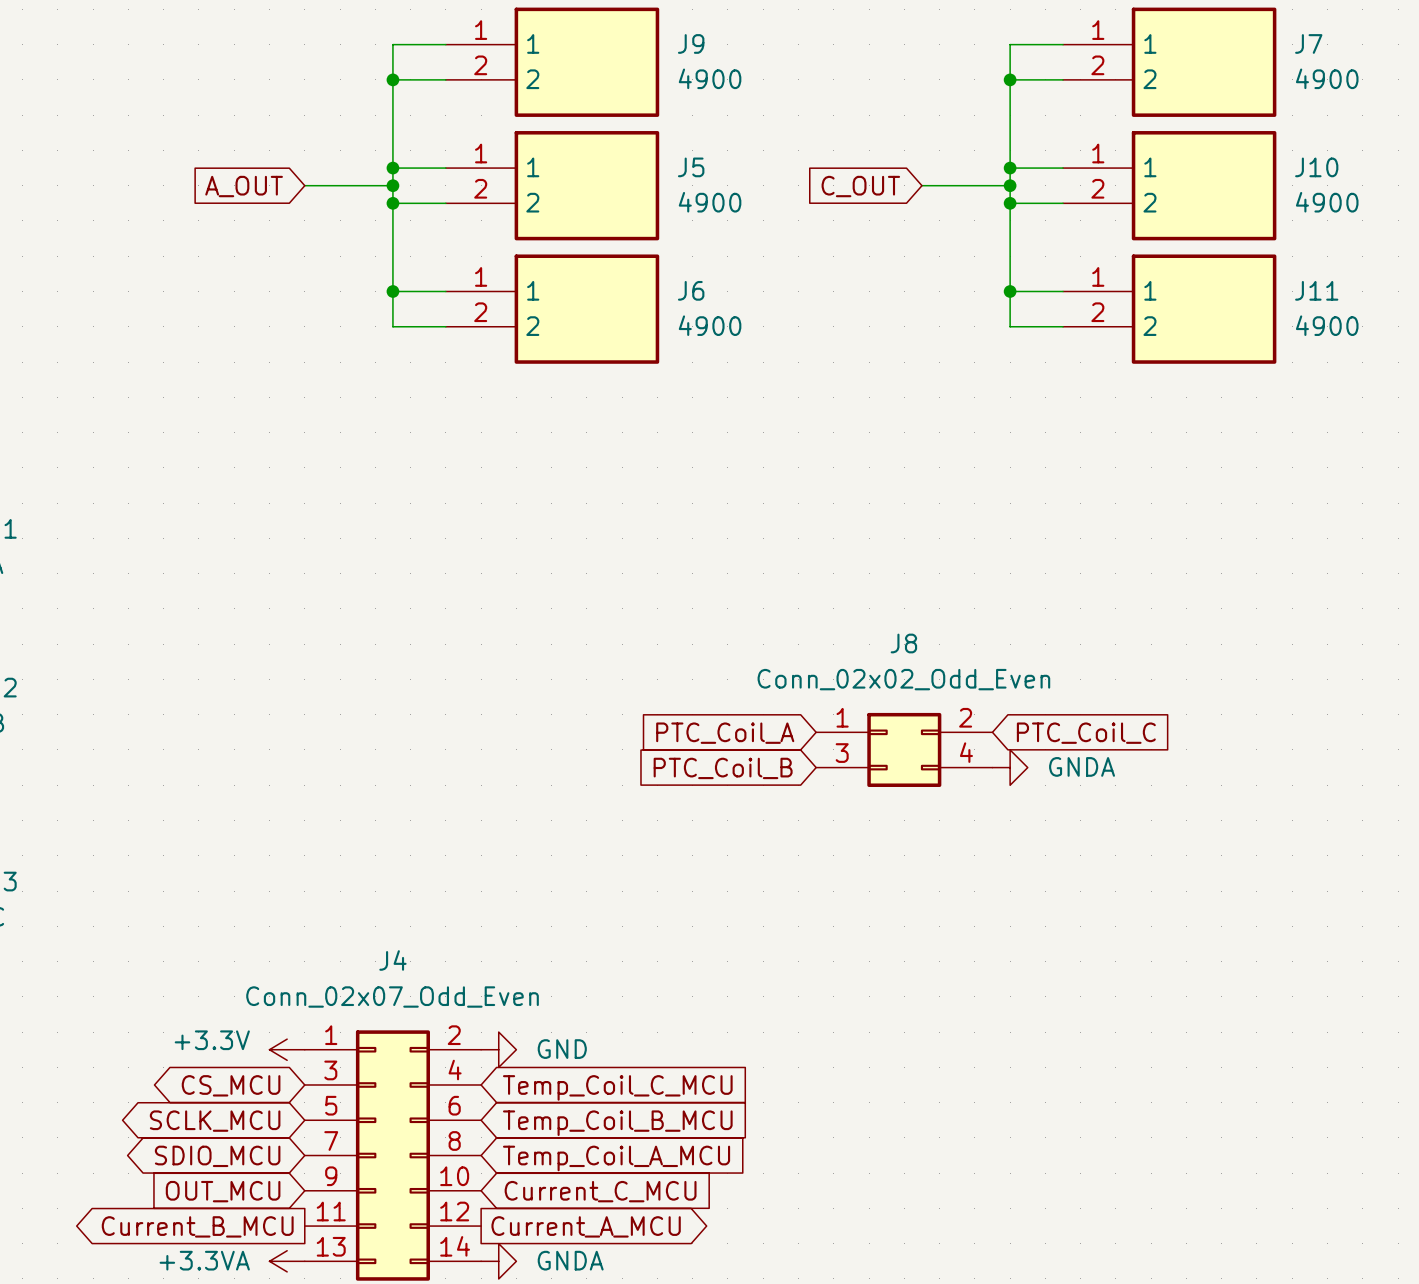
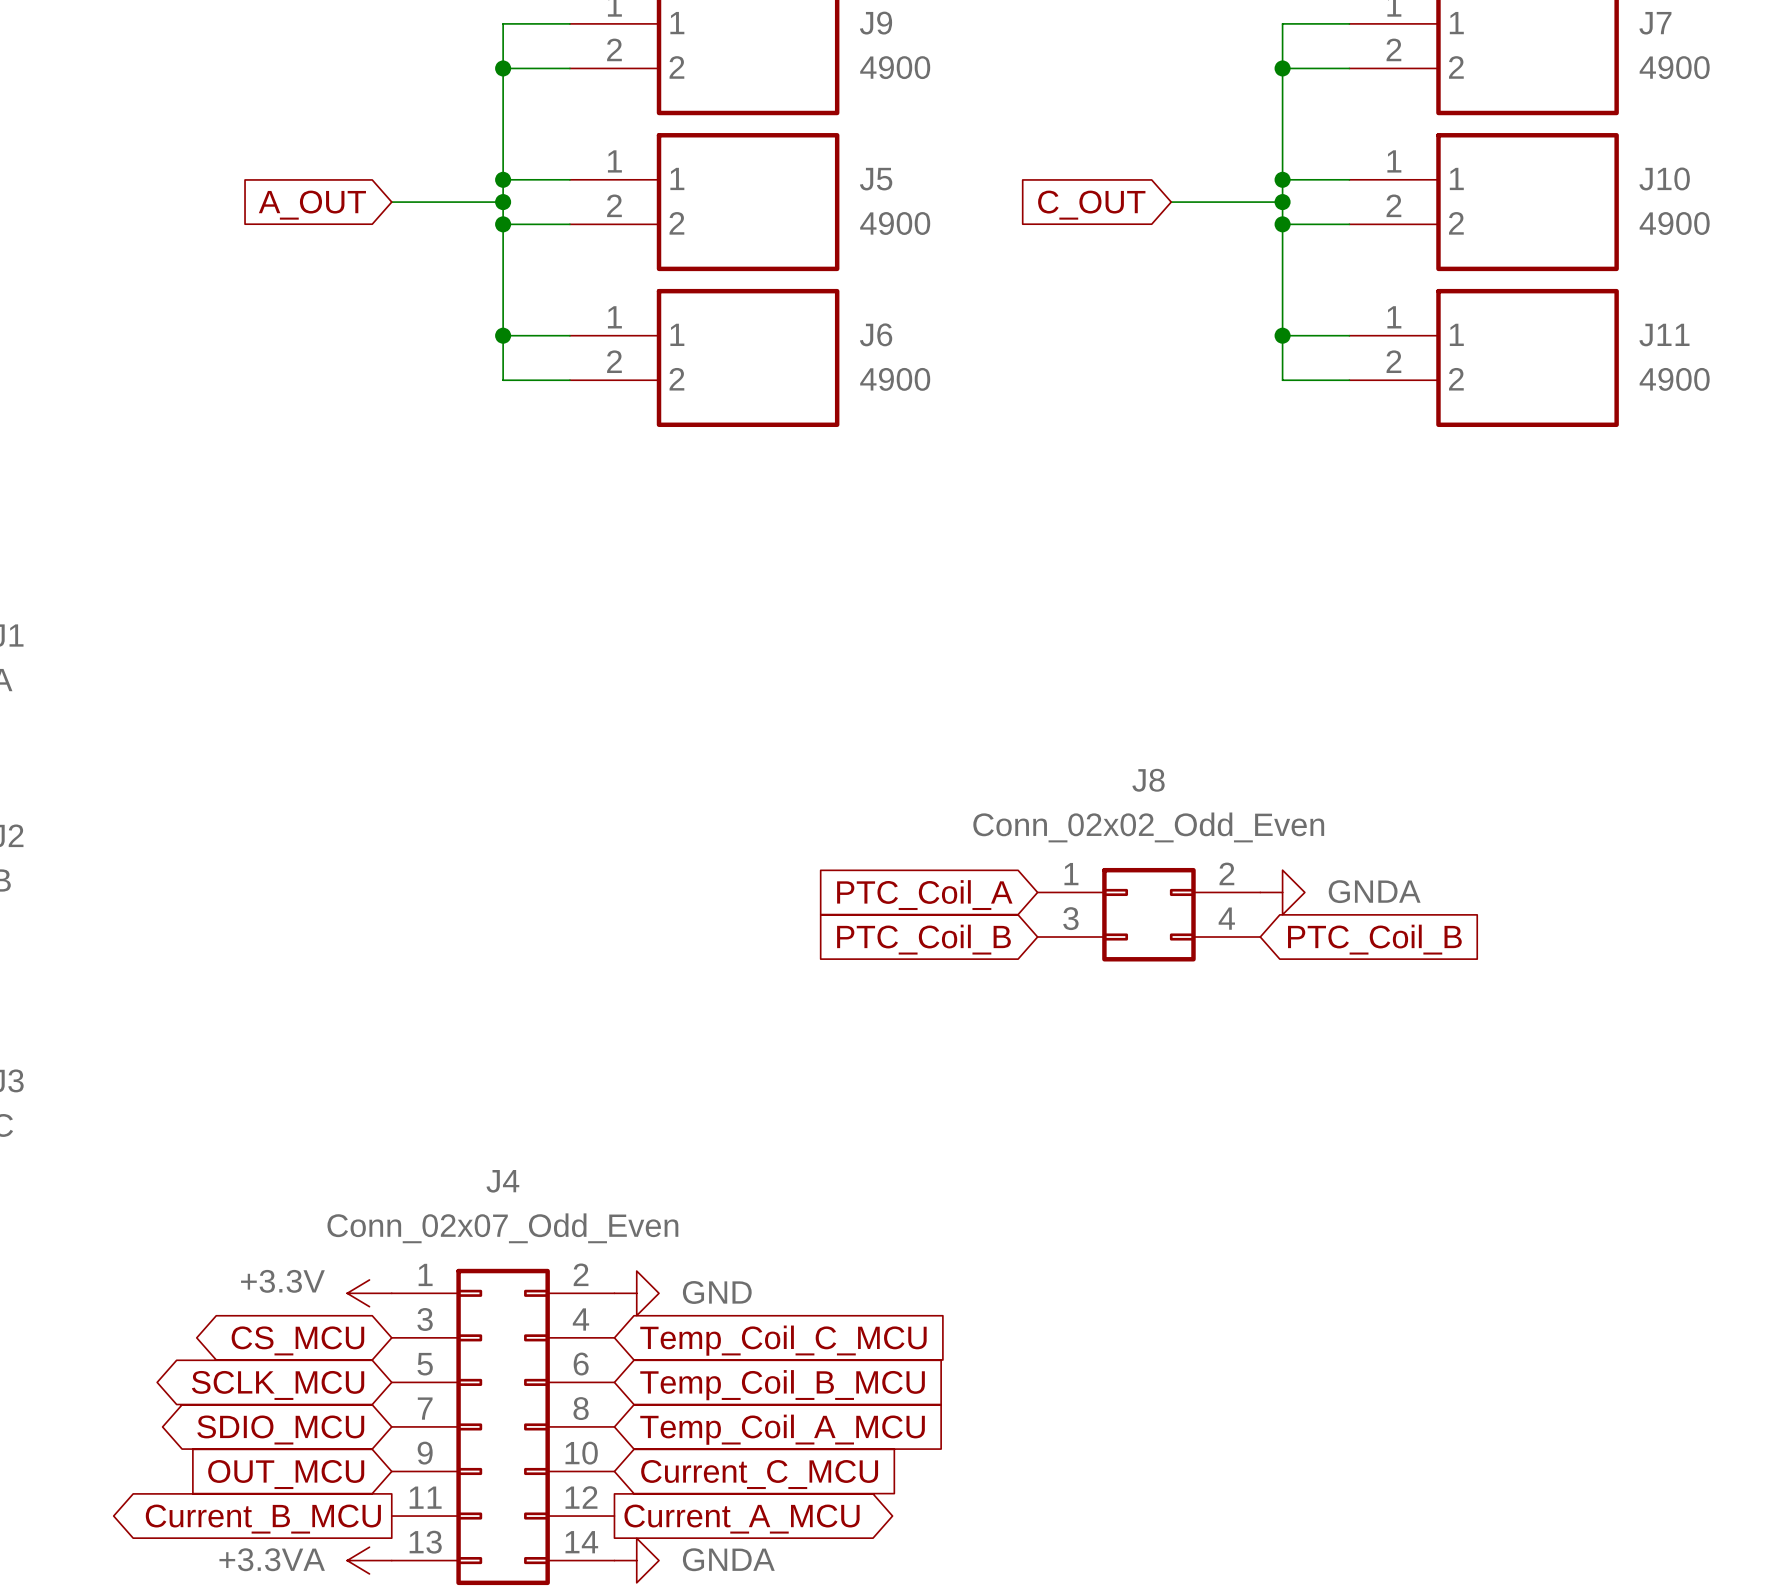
global label: PTC_Coil_C (1086, 733) -> PTC_Coil_B (1374, 939)
power symbol position: GNDA (1010, 767) -> GNDA (1282, 892)

